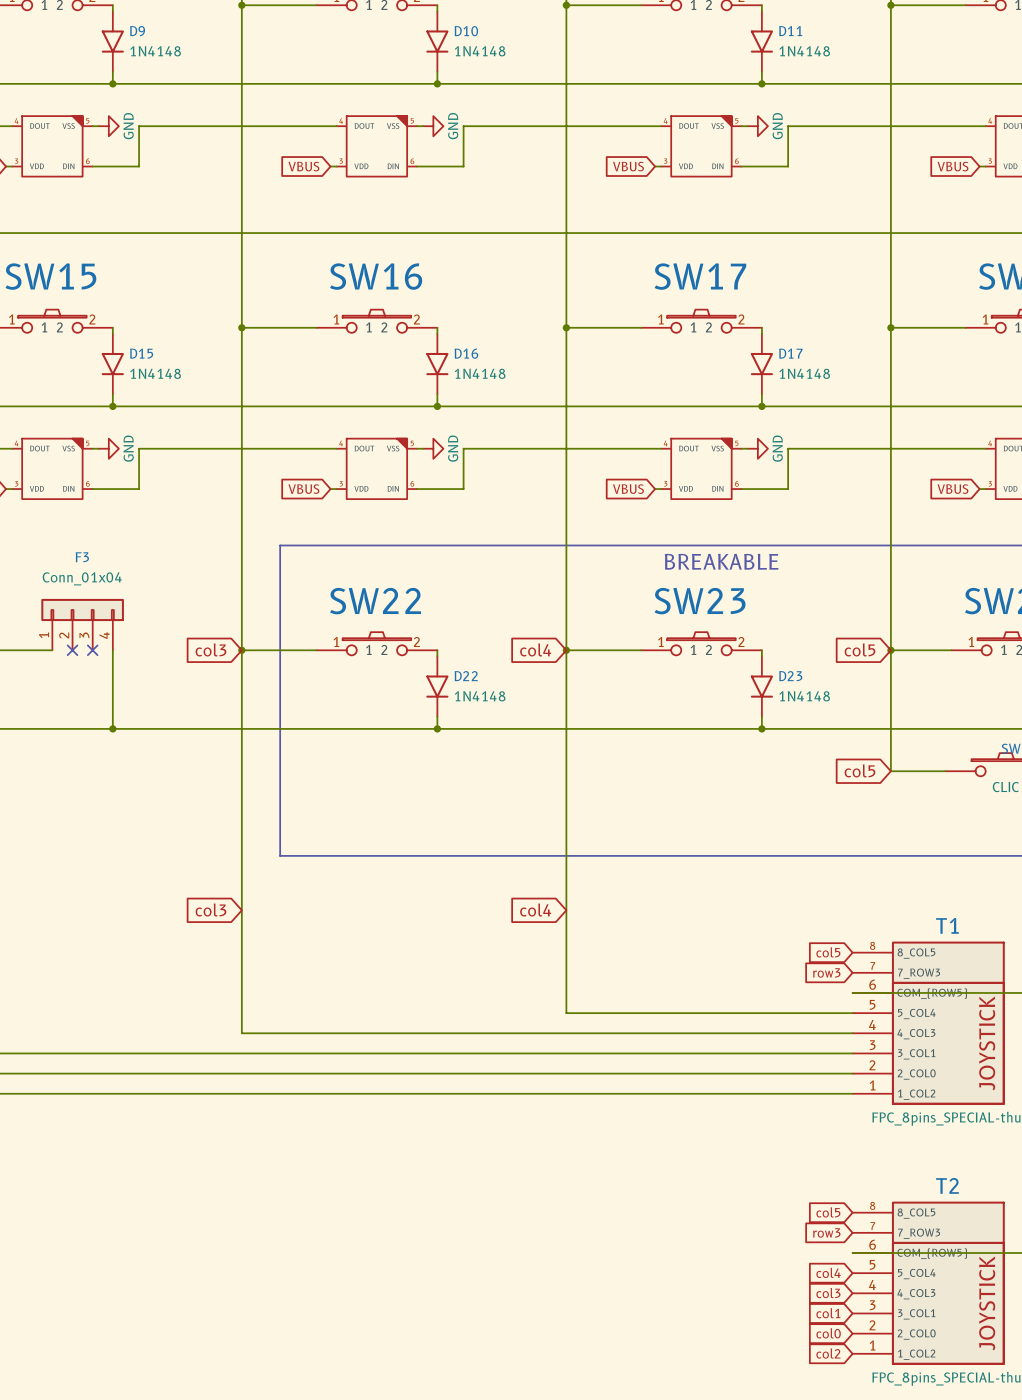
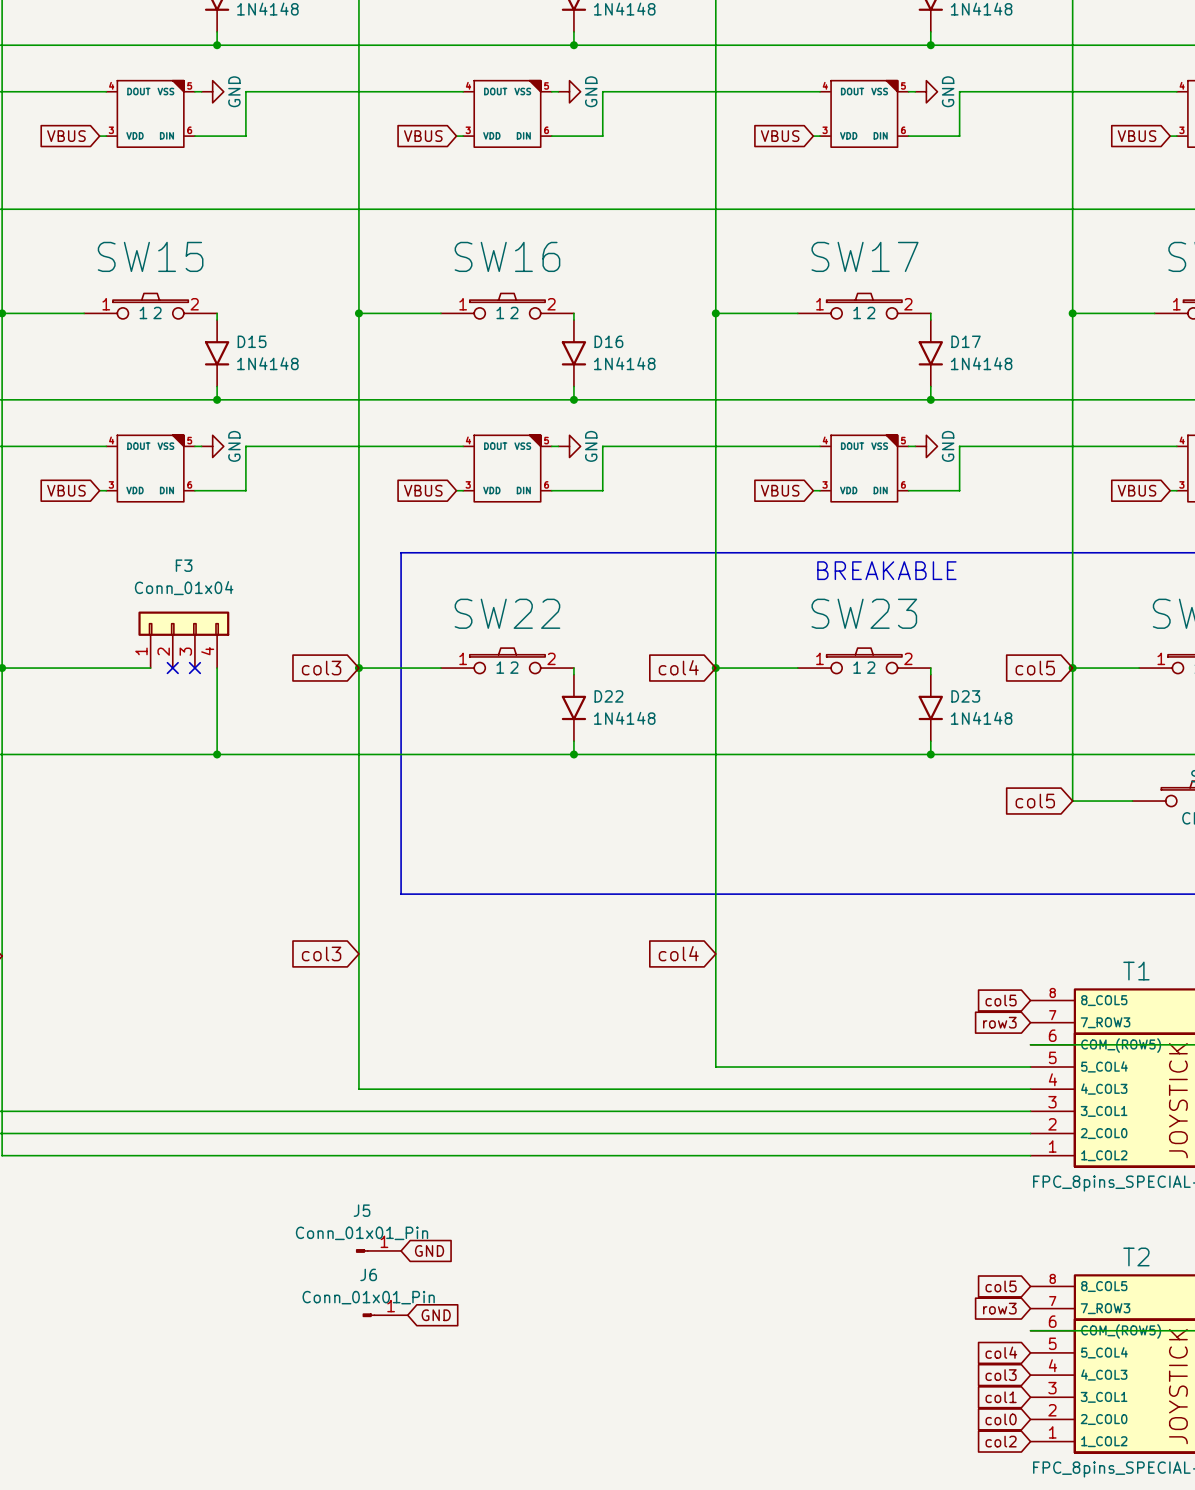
J5: none -> Conn_01x01_Pin (378, 1250)
global label: none -> GND (429, 1250)
J6: none -> Conn_01x01_Pin (385, 1315)
global label: none -> GND (436, 1315)

